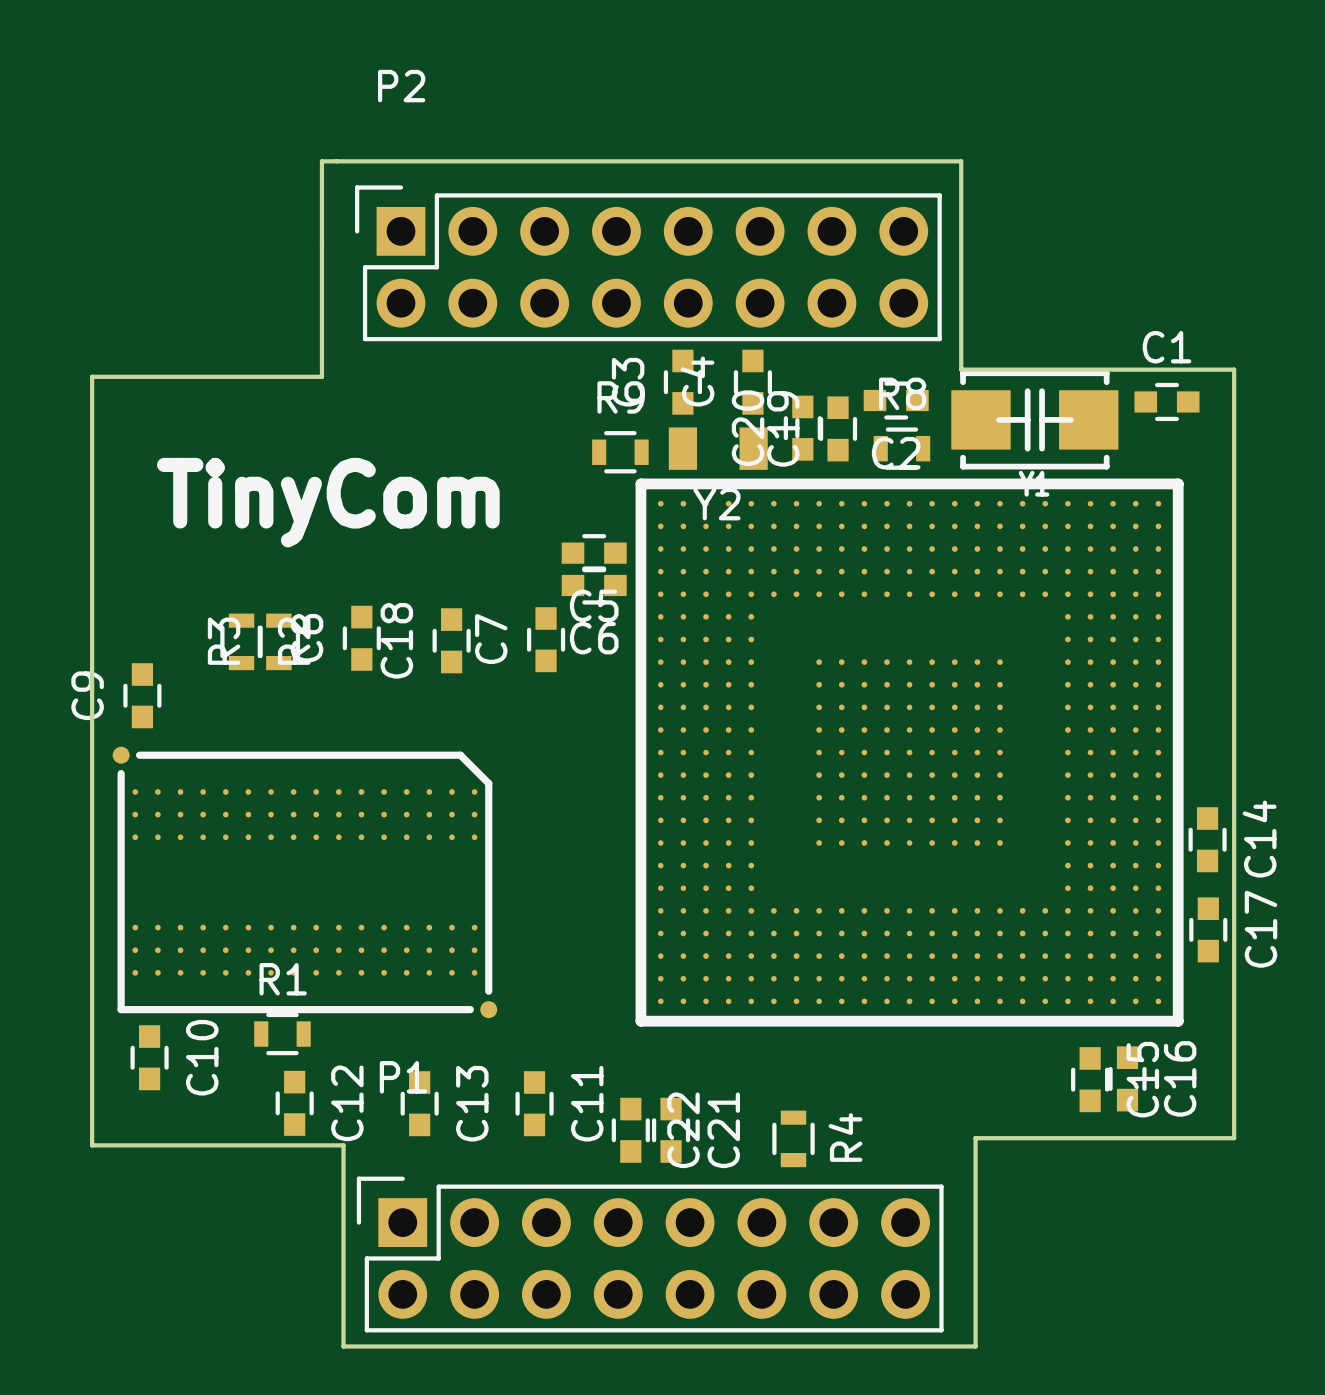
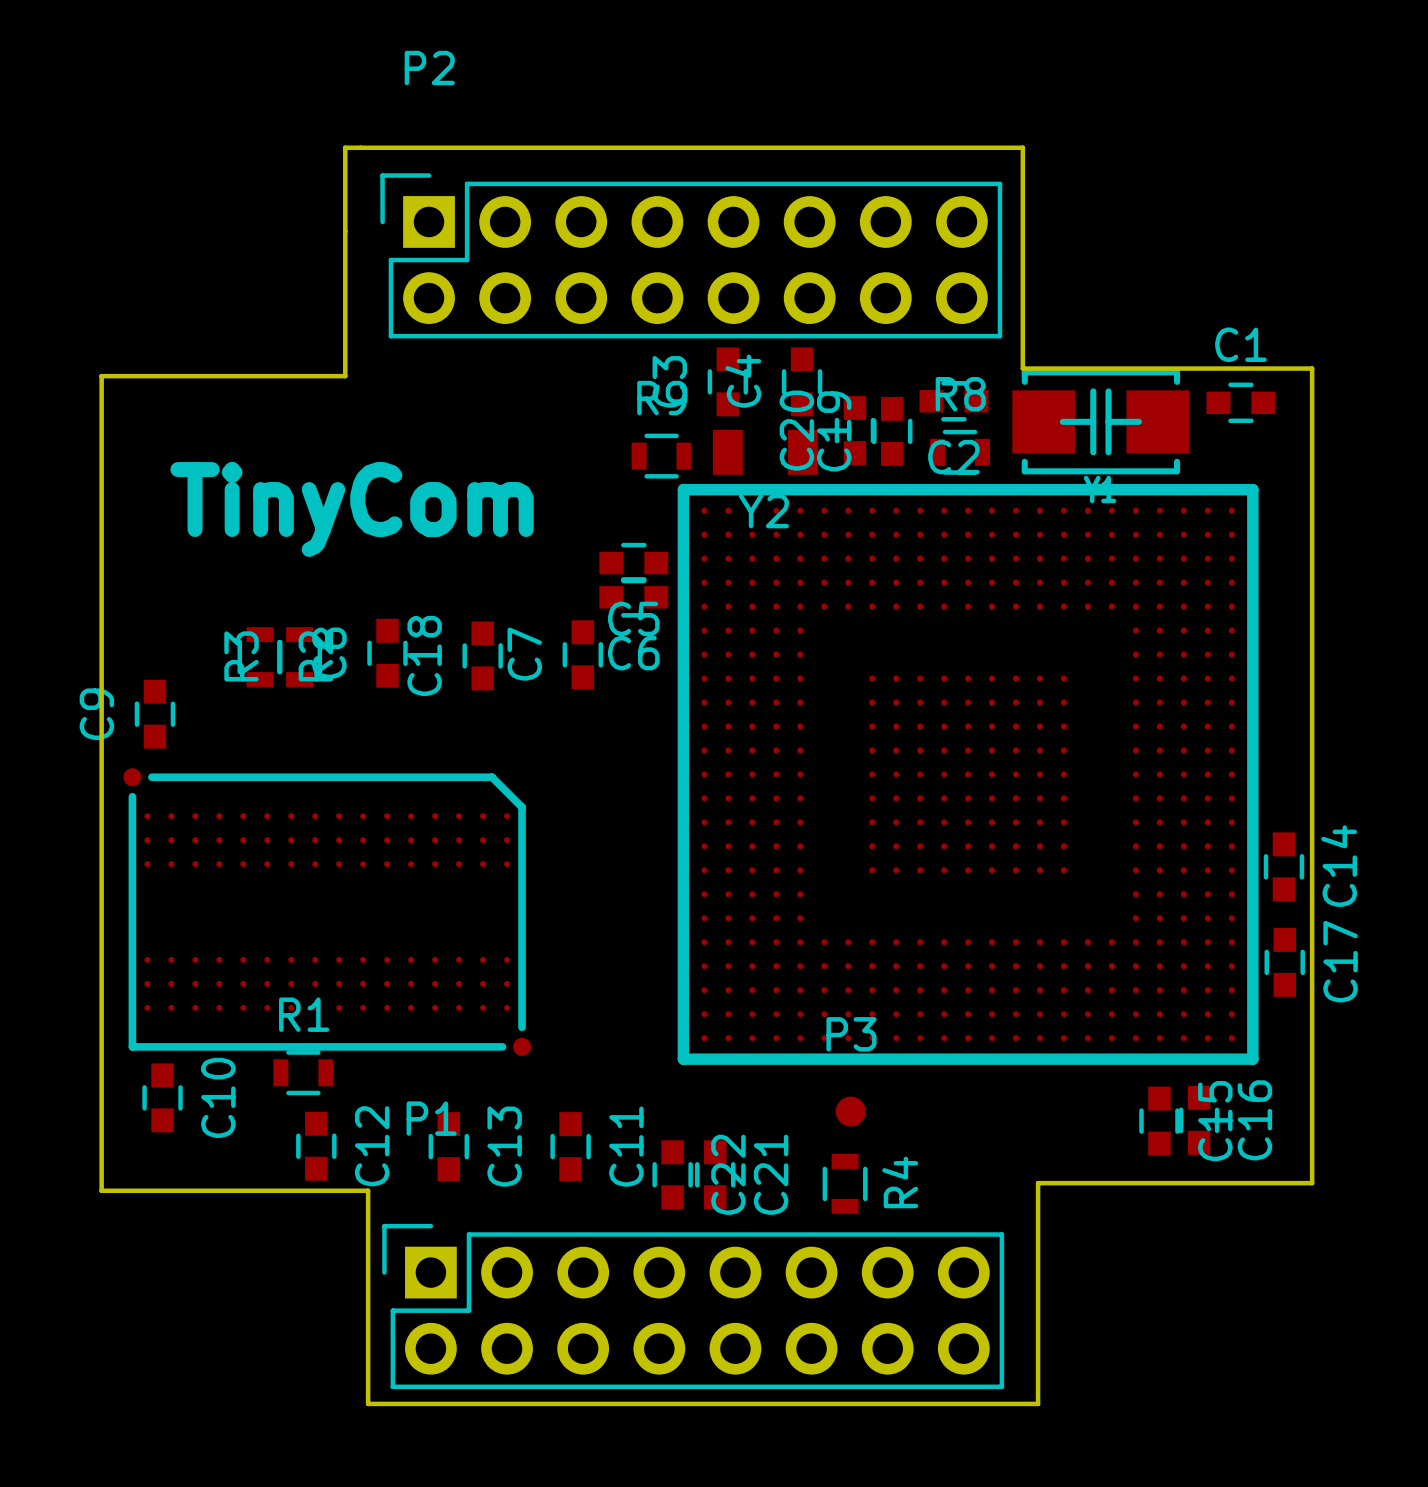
P3: none -> (850, 1111)

